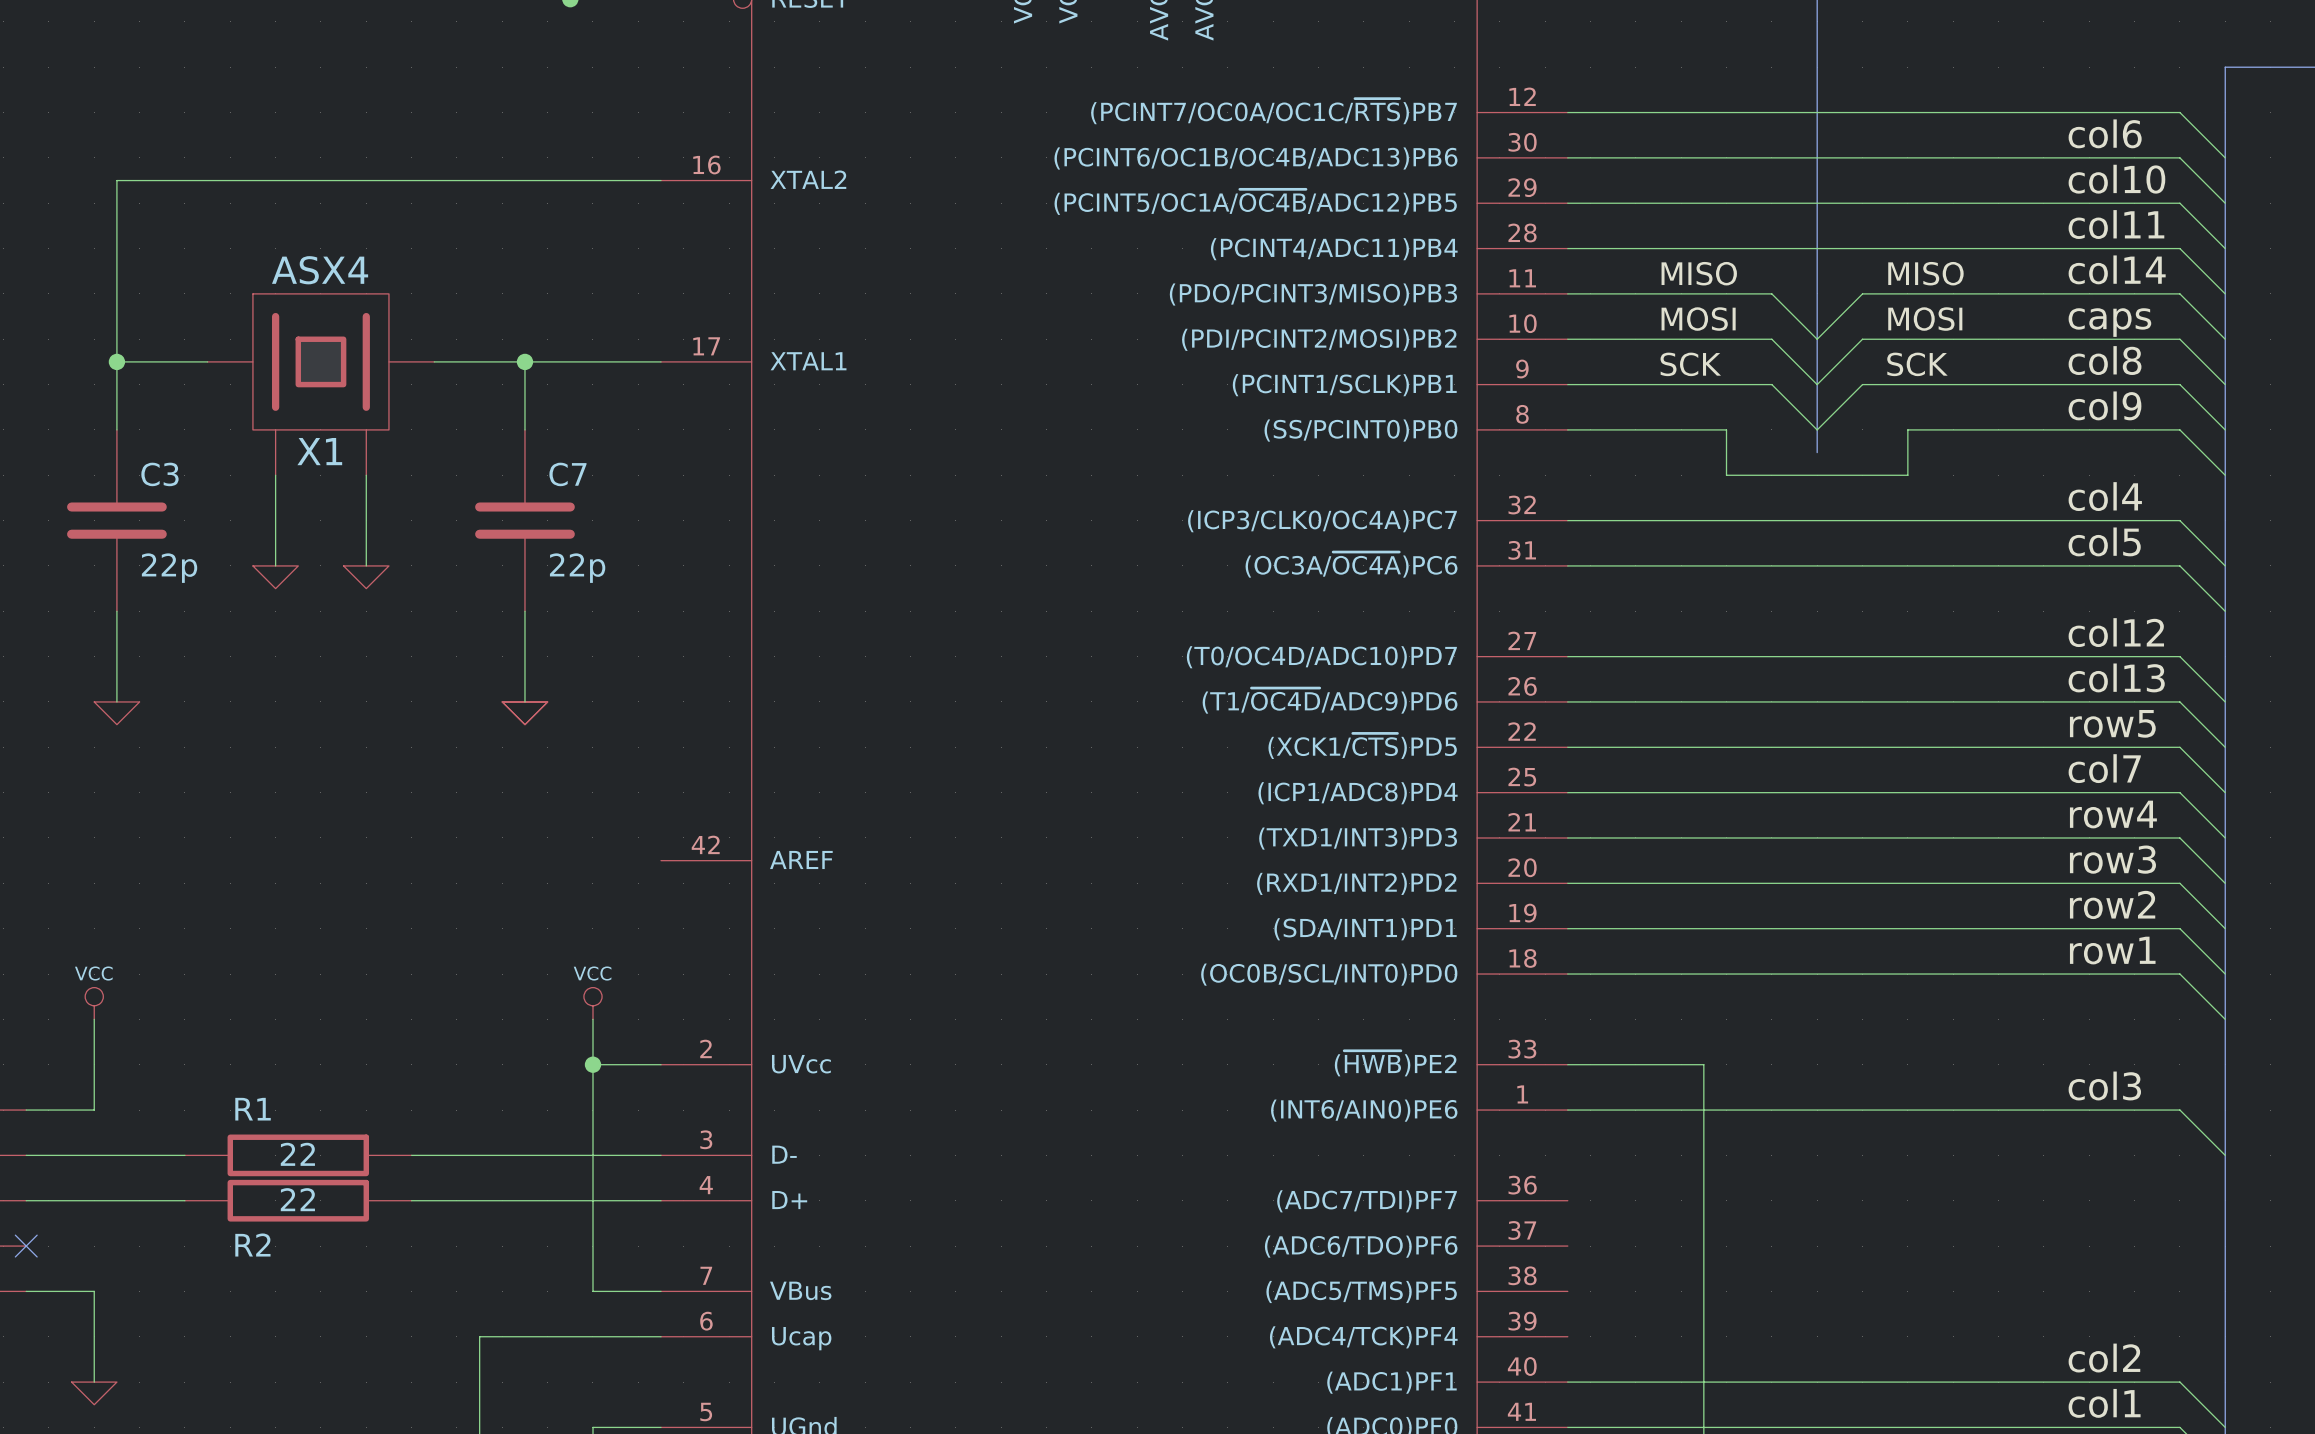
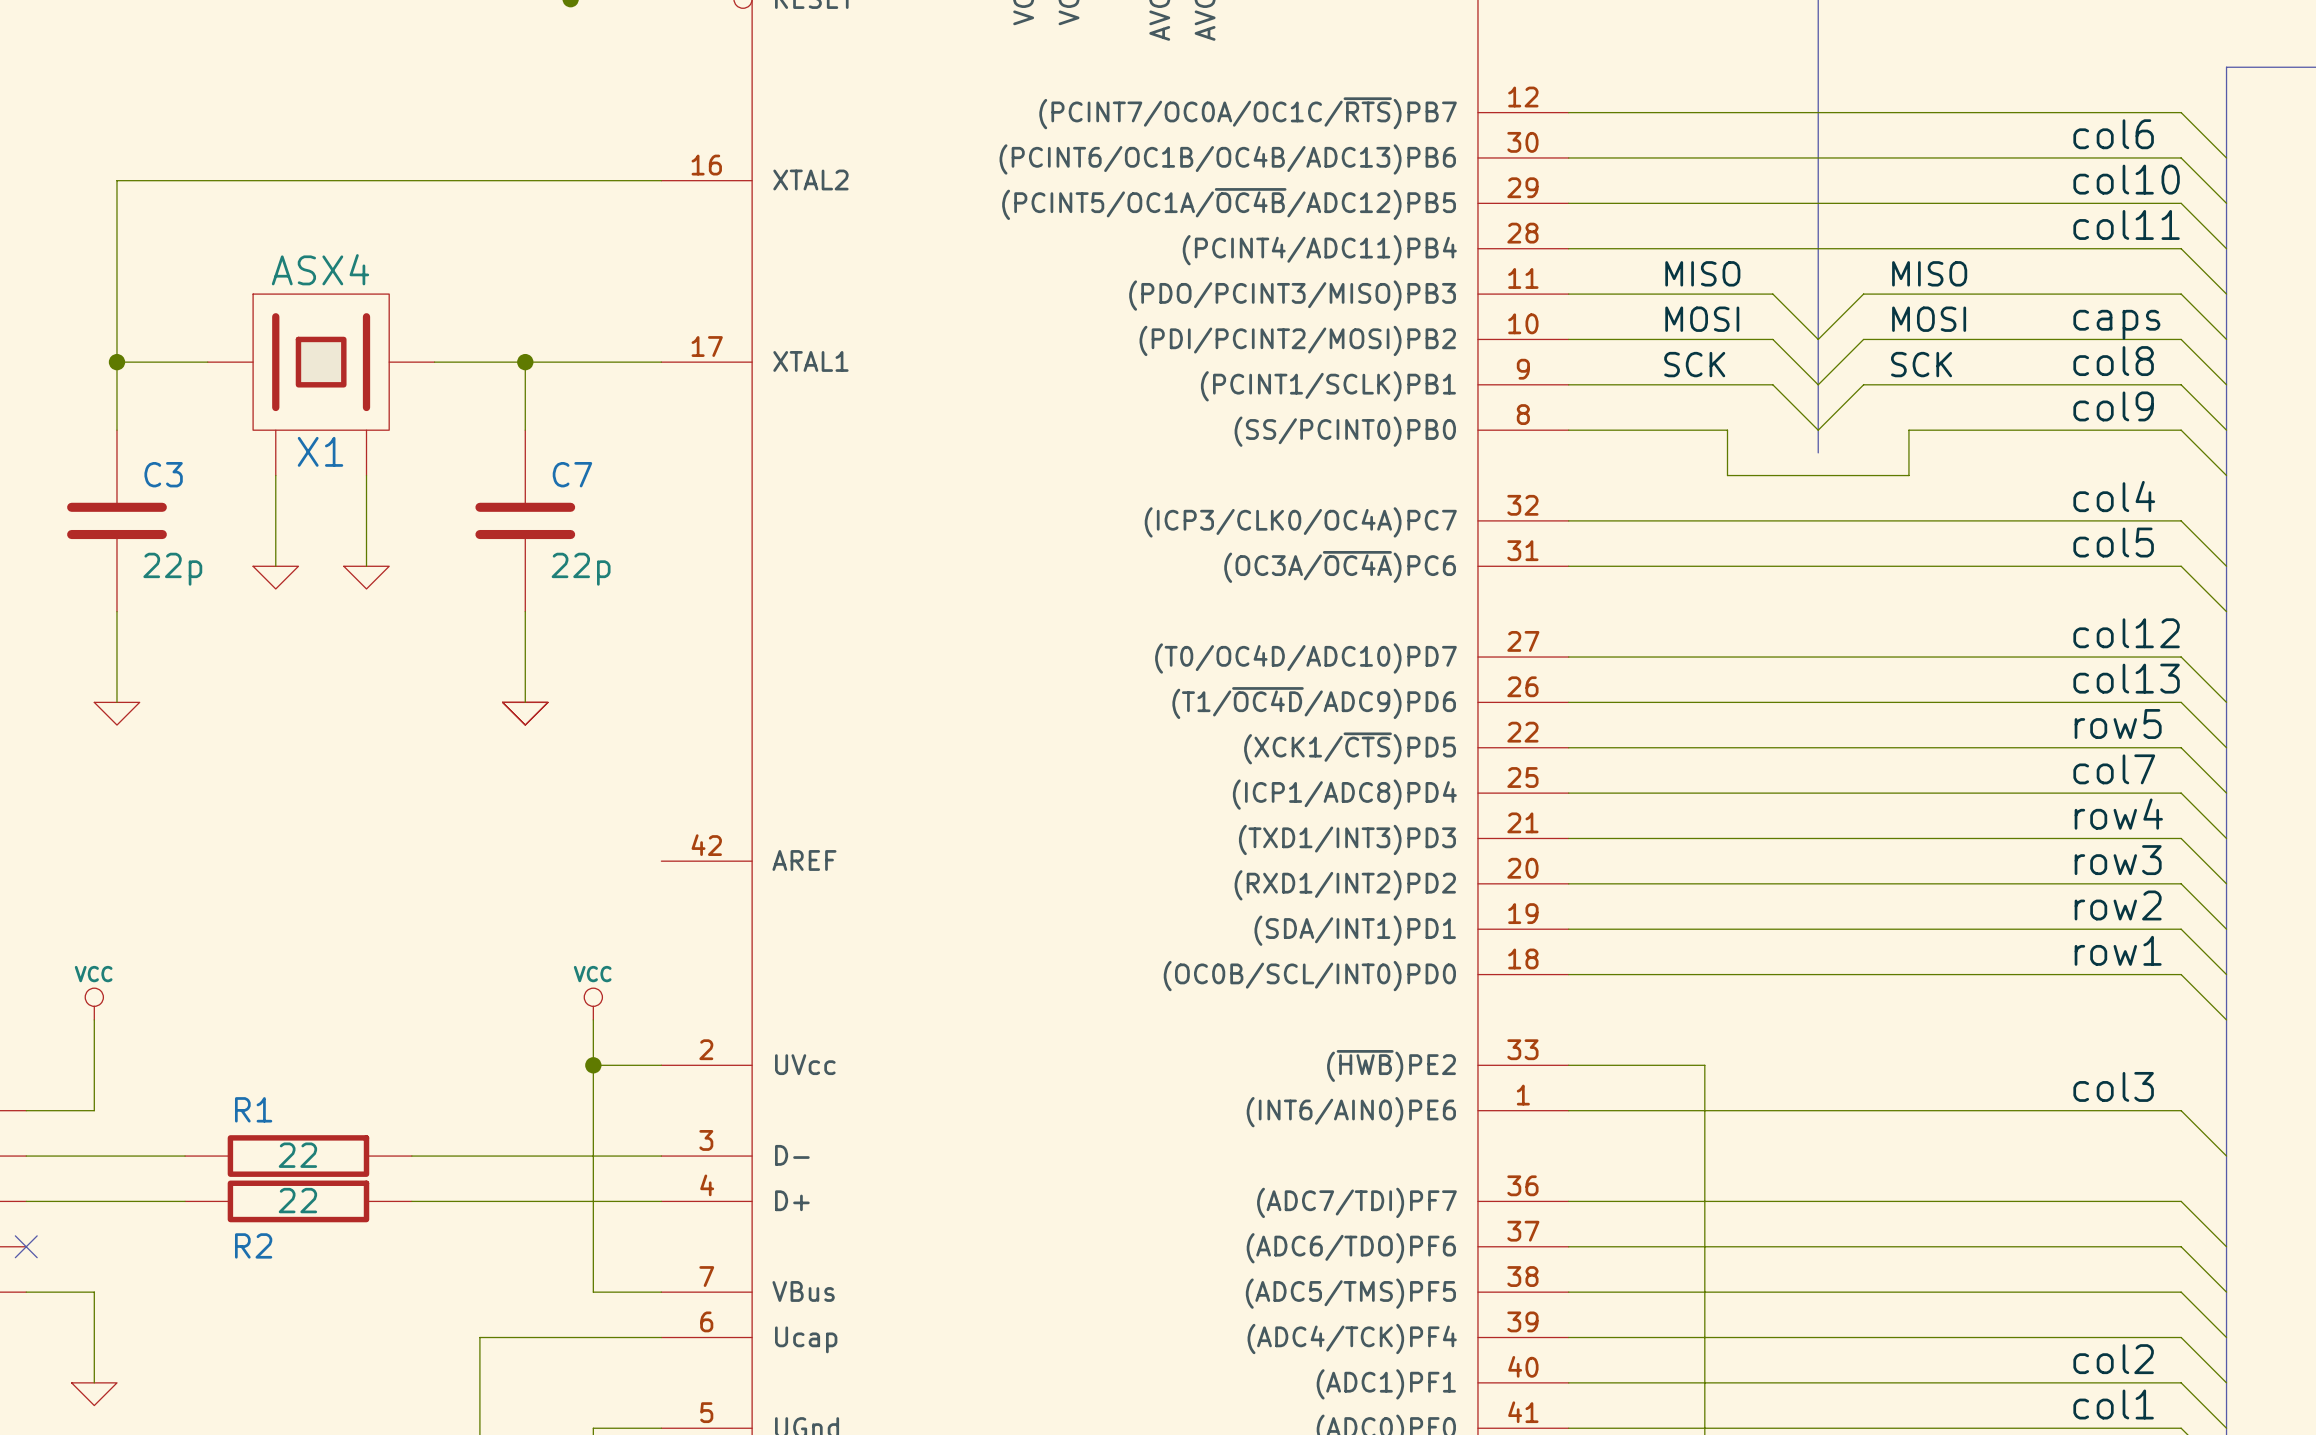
label: col14 (2117, 269) -> none
wire: none -> (1568, 1201) (2181, 1201) (2226, 1246)
wire: none -> (1568, 1246) (2181, 1246) (2226, 1292)
wire: none -> (1568, 1292) (2181, 1292) (2226, 1337)
wire: none -> (1568, 1337) (2181, 1337) (2226, 1382)

